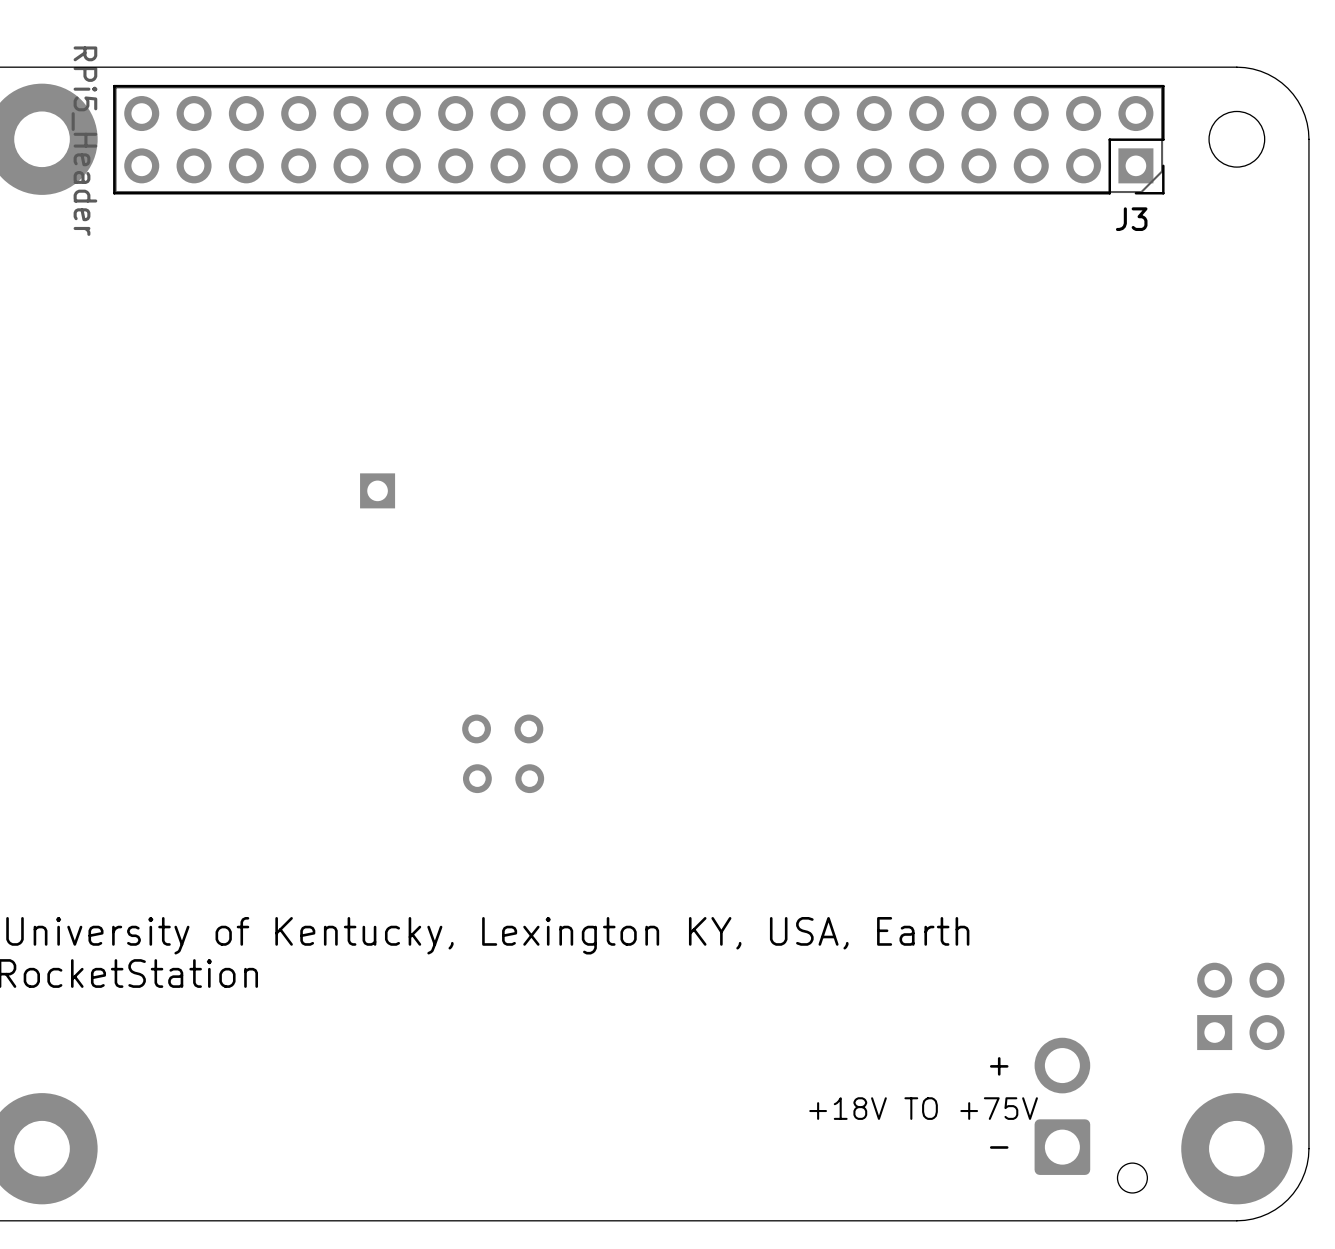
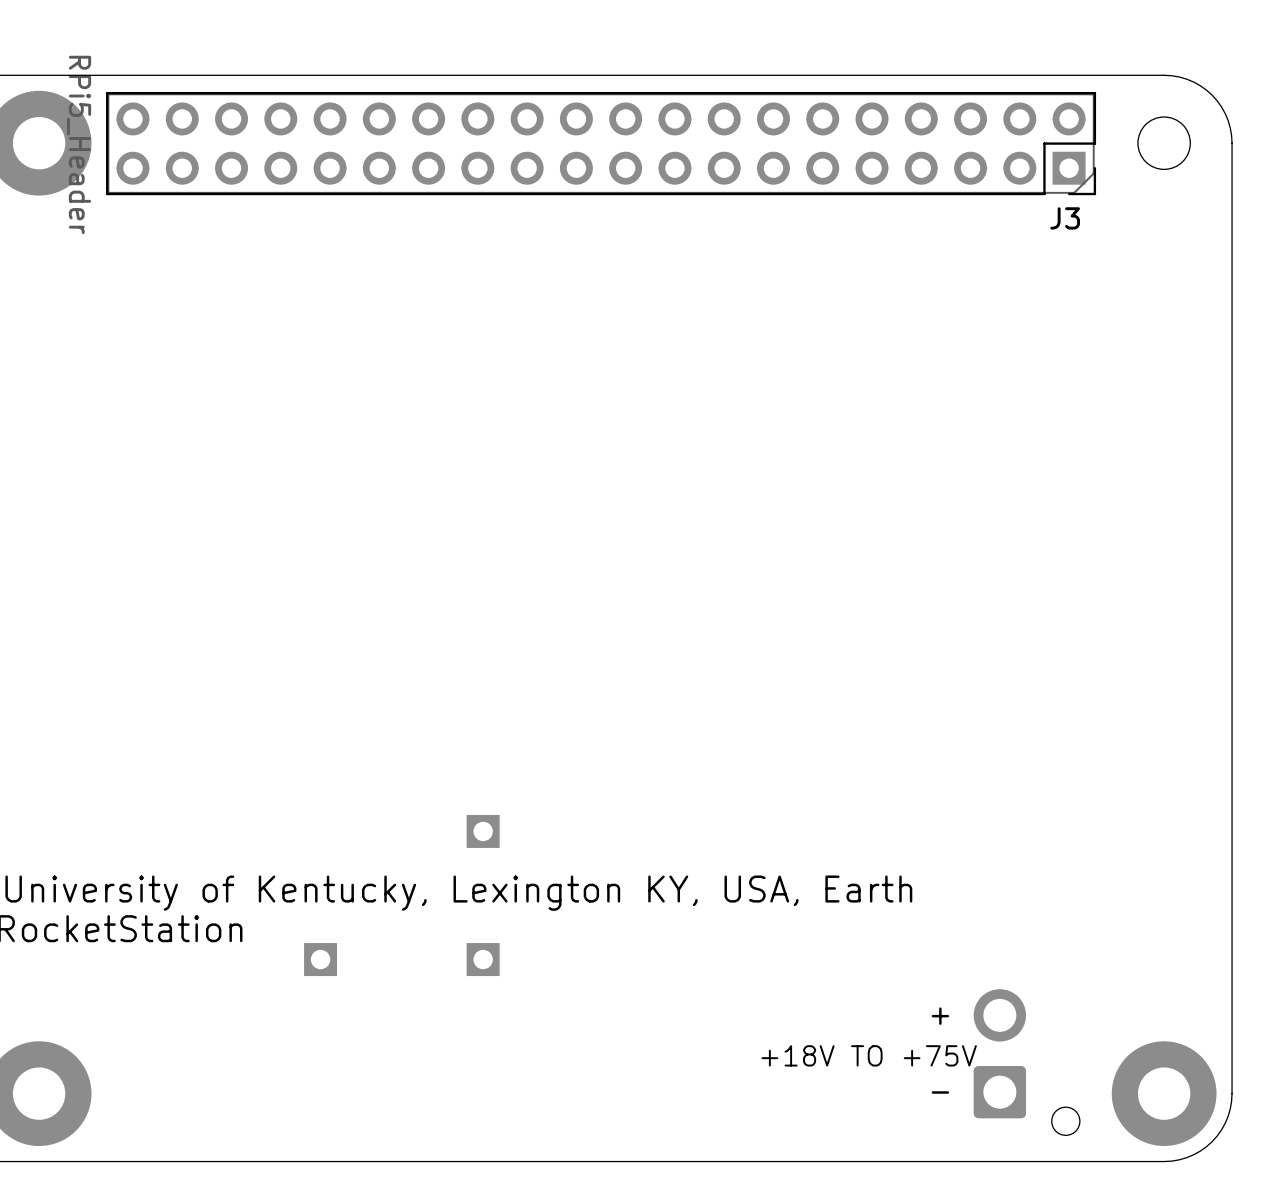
part: (377, 490) -> none
part: (502, 728) -> none
part: (503, 778) -> none
part: none -> (483, 831)
part: none -> (320, 959)
part: none -> (483, 959)
part: (1240, 1006) -> none

